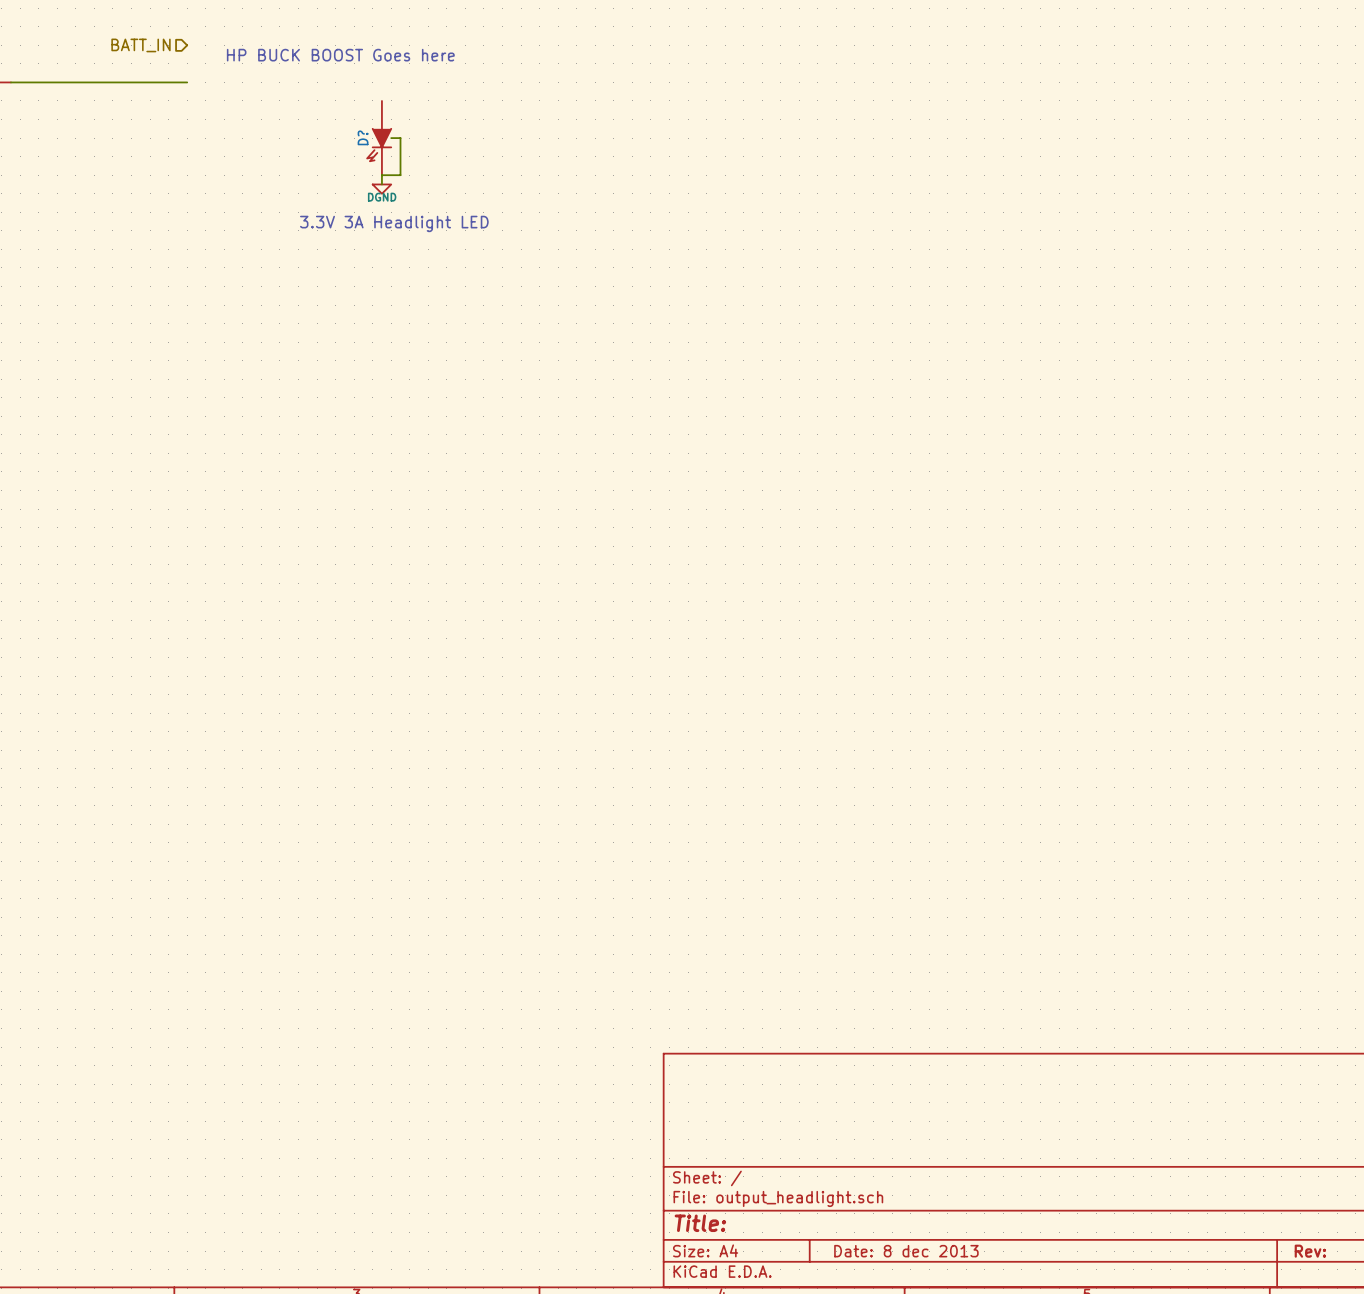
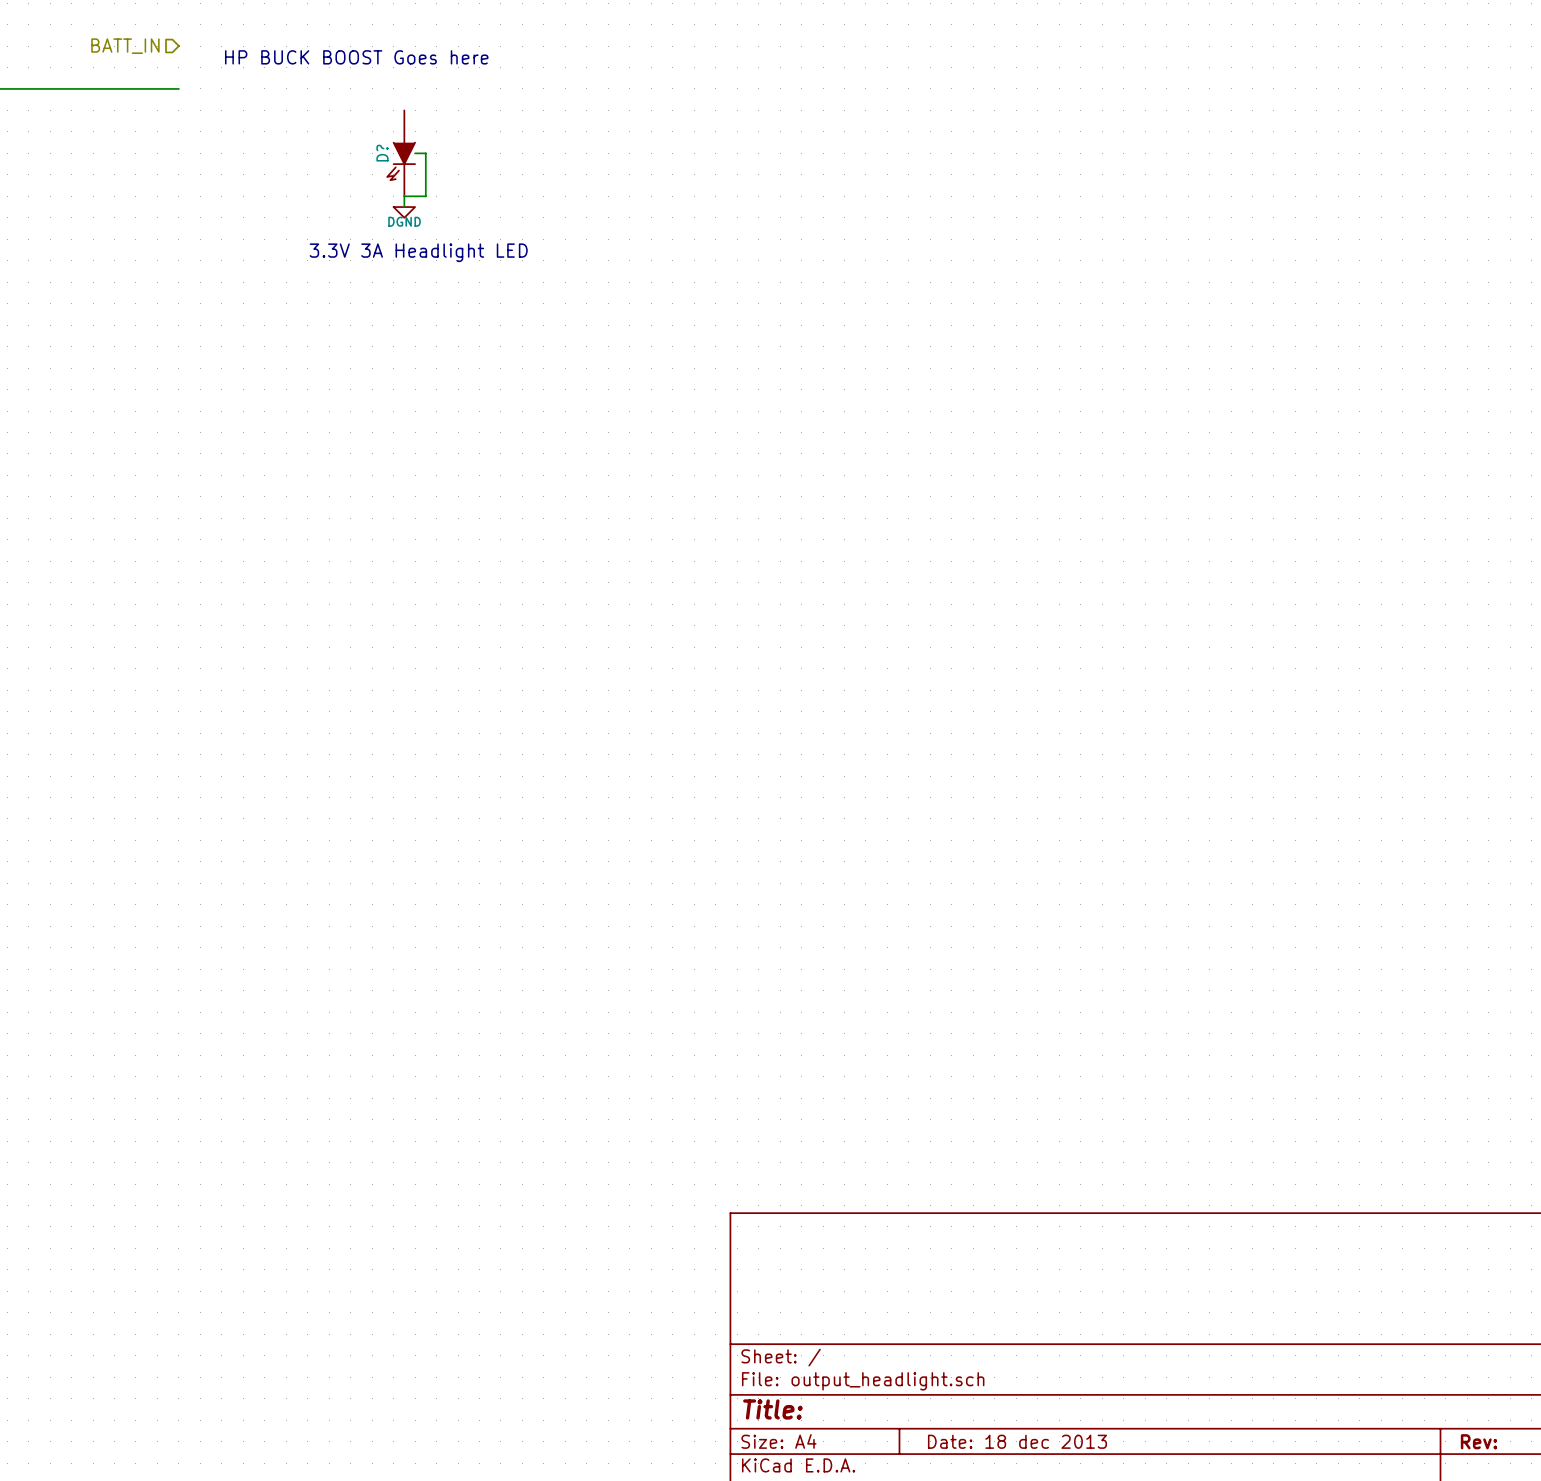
title block: Date: 8 dec 2013 (906, 1251) -> Date: 18 dec 2013 (1017, 1441)

